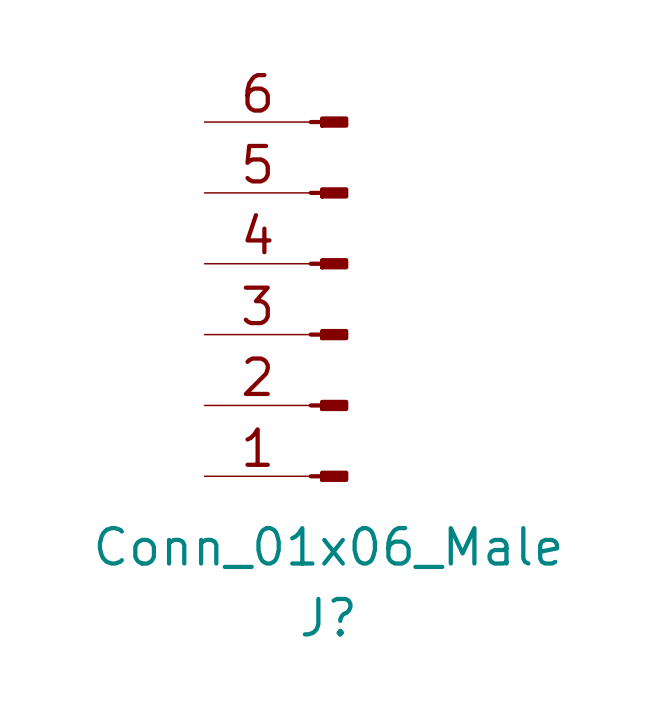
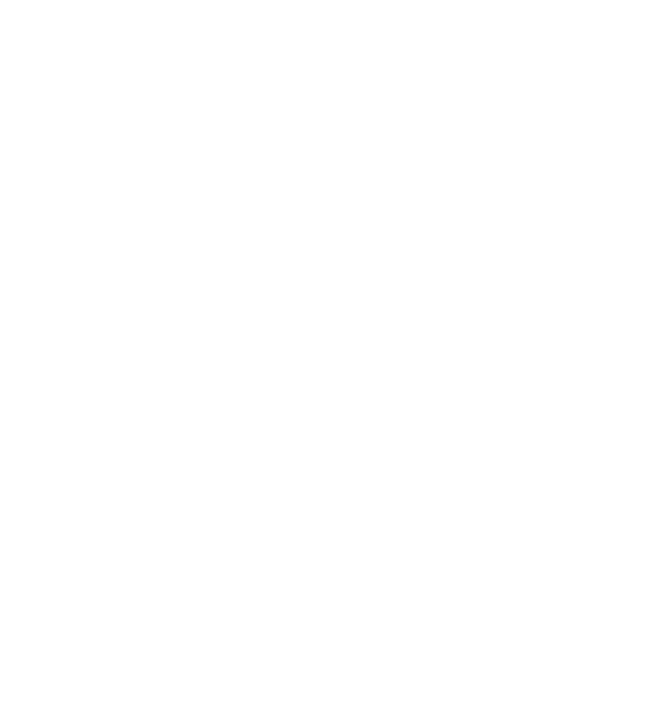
J?: Conn_01x06_Male (276, 299) -> none

